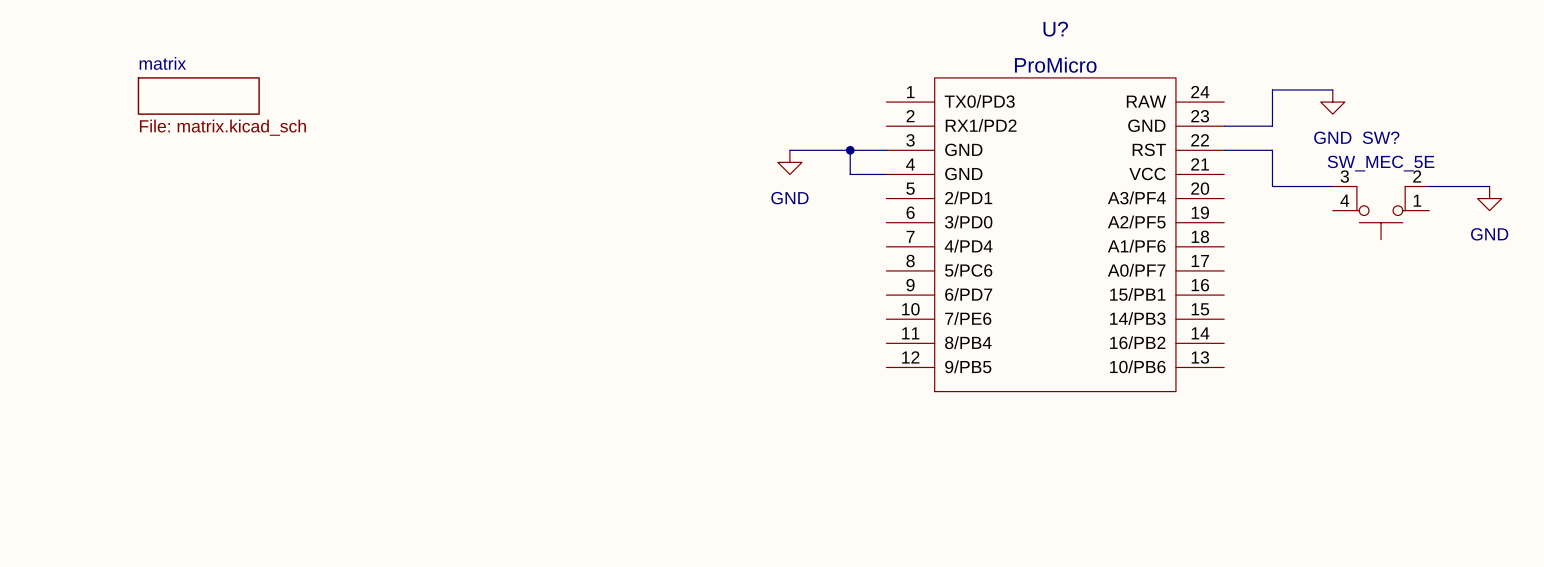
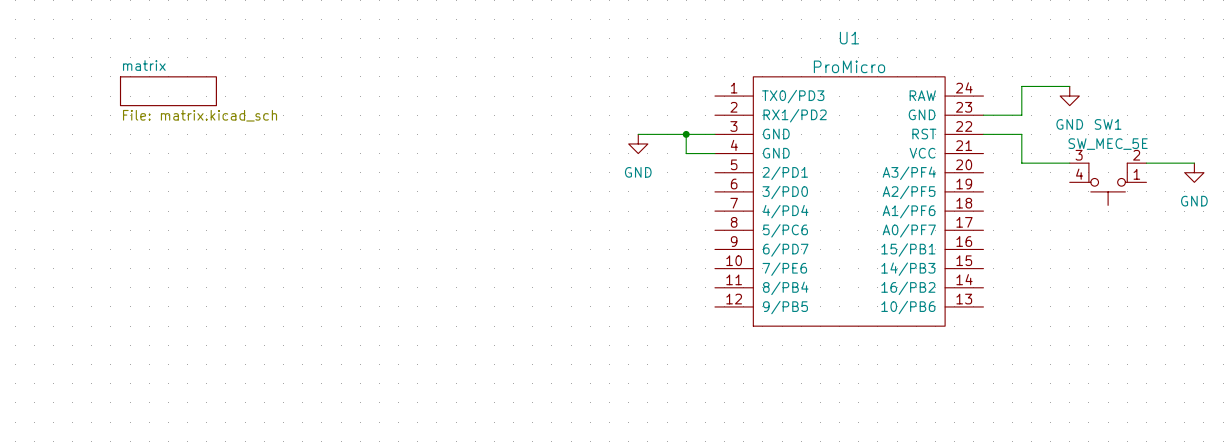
U? name: U? (1055, 29) -> U1 (849, 38)
SW? name: SW? (1381, 137) -> SW1 (1108, 124)

